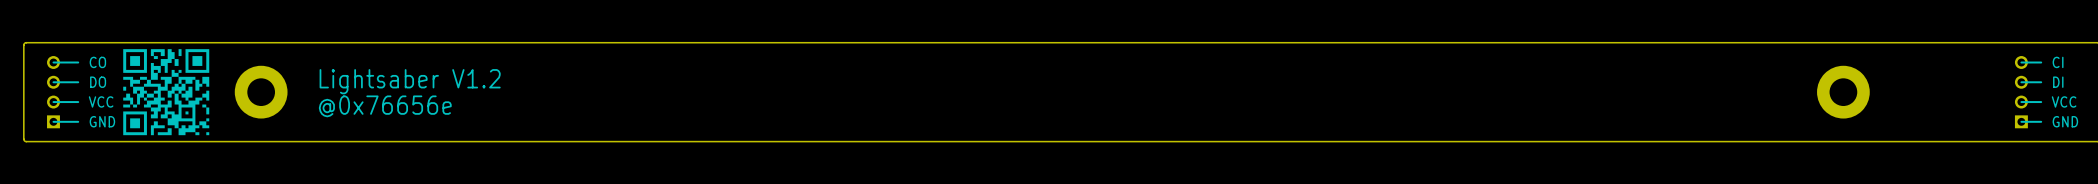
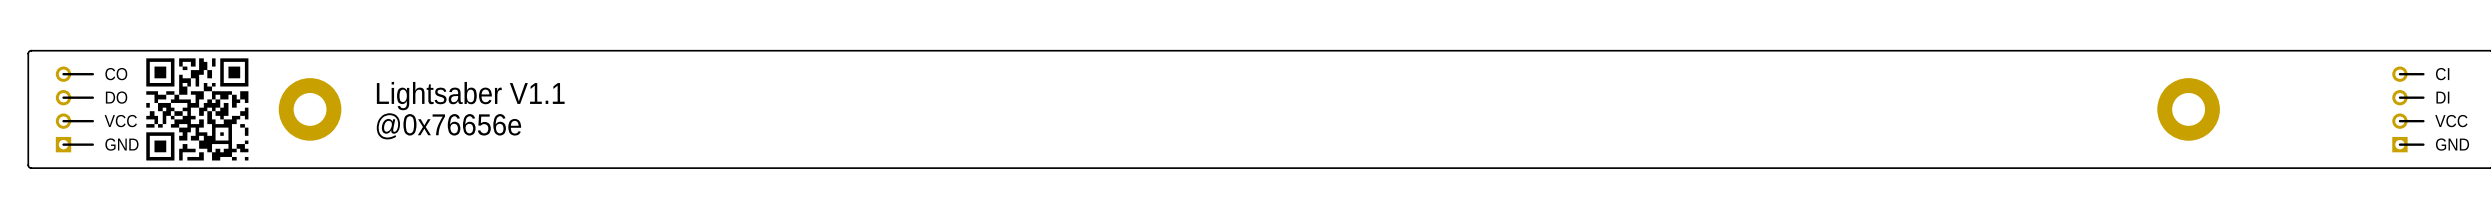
text: Lightsaber V1.2 (410, 81) -> Lightsaber V1.1 (470, 96)

